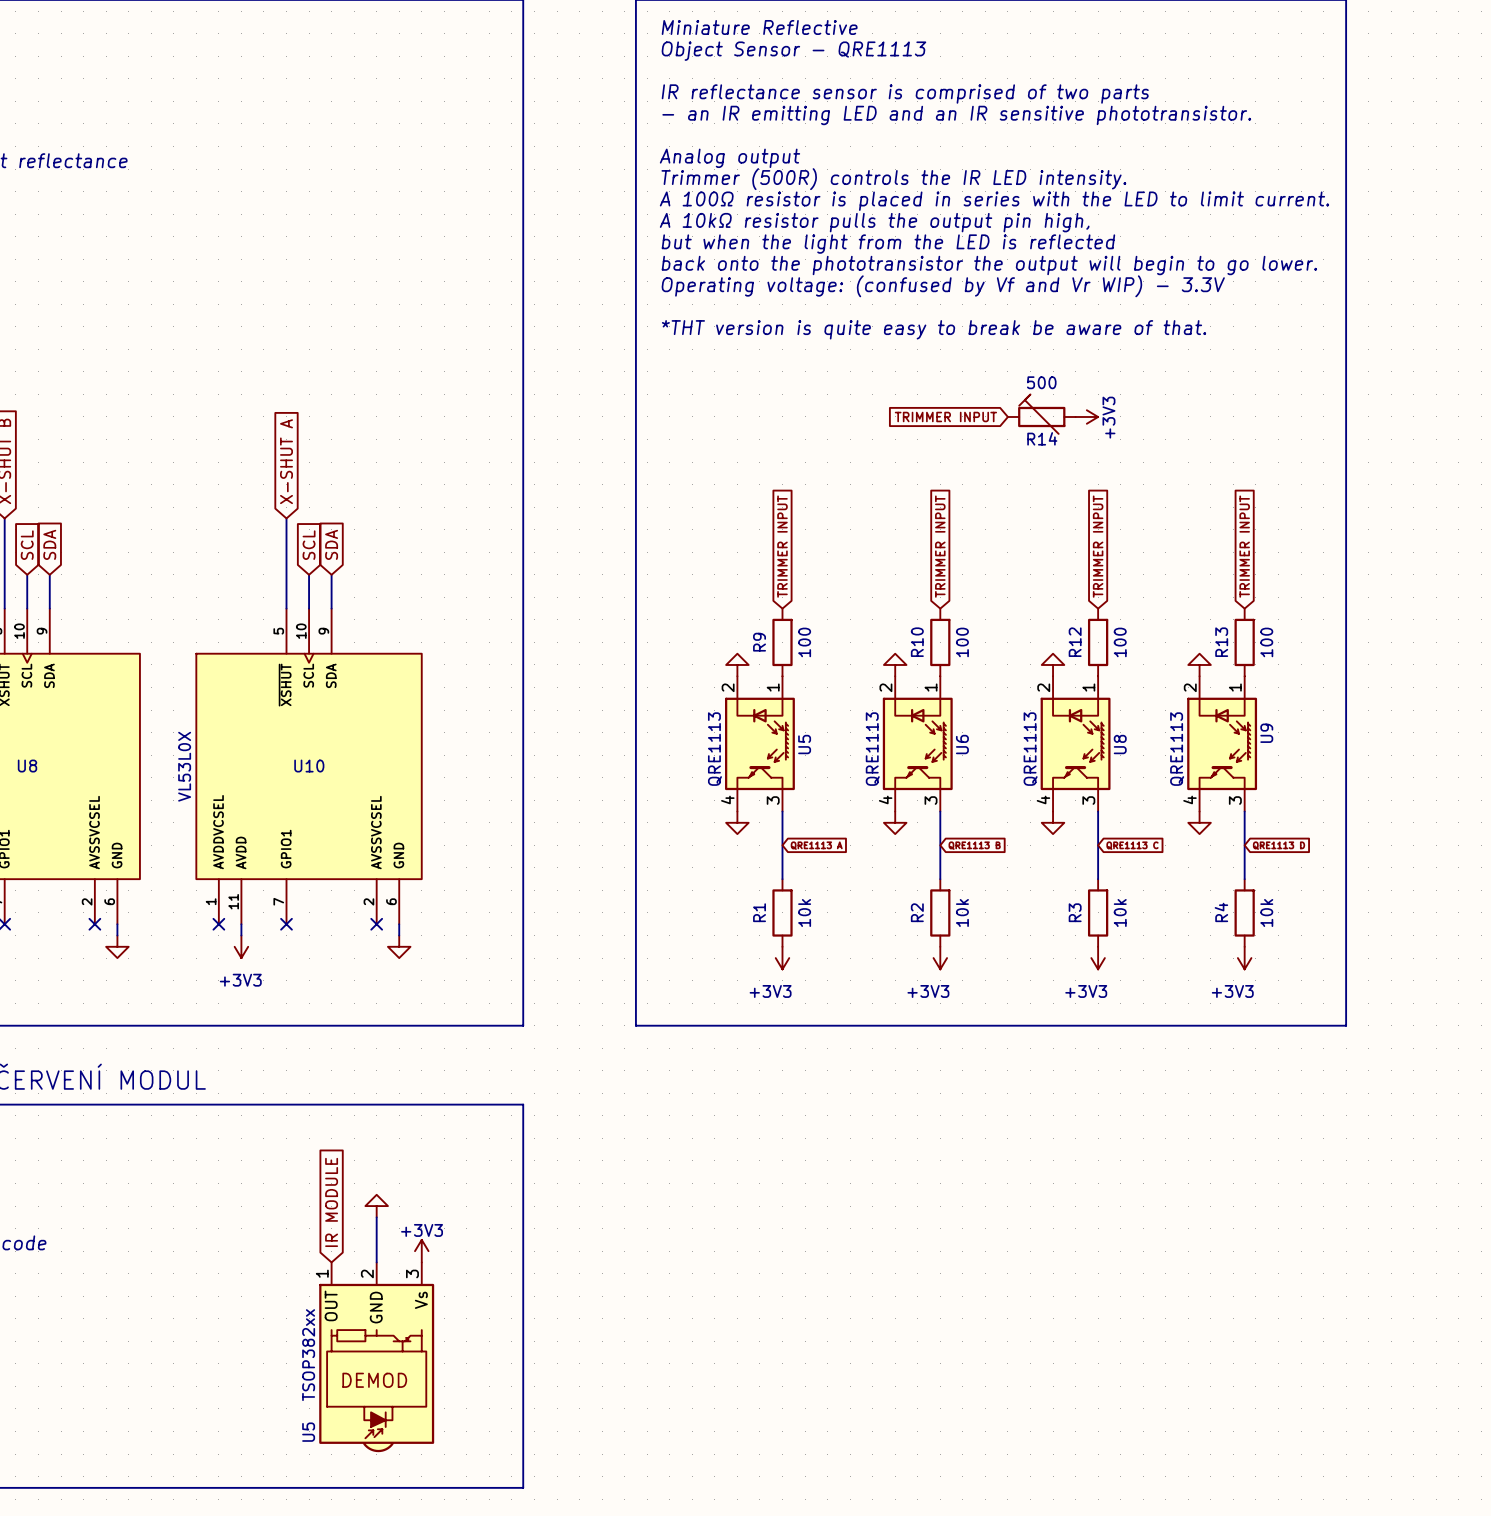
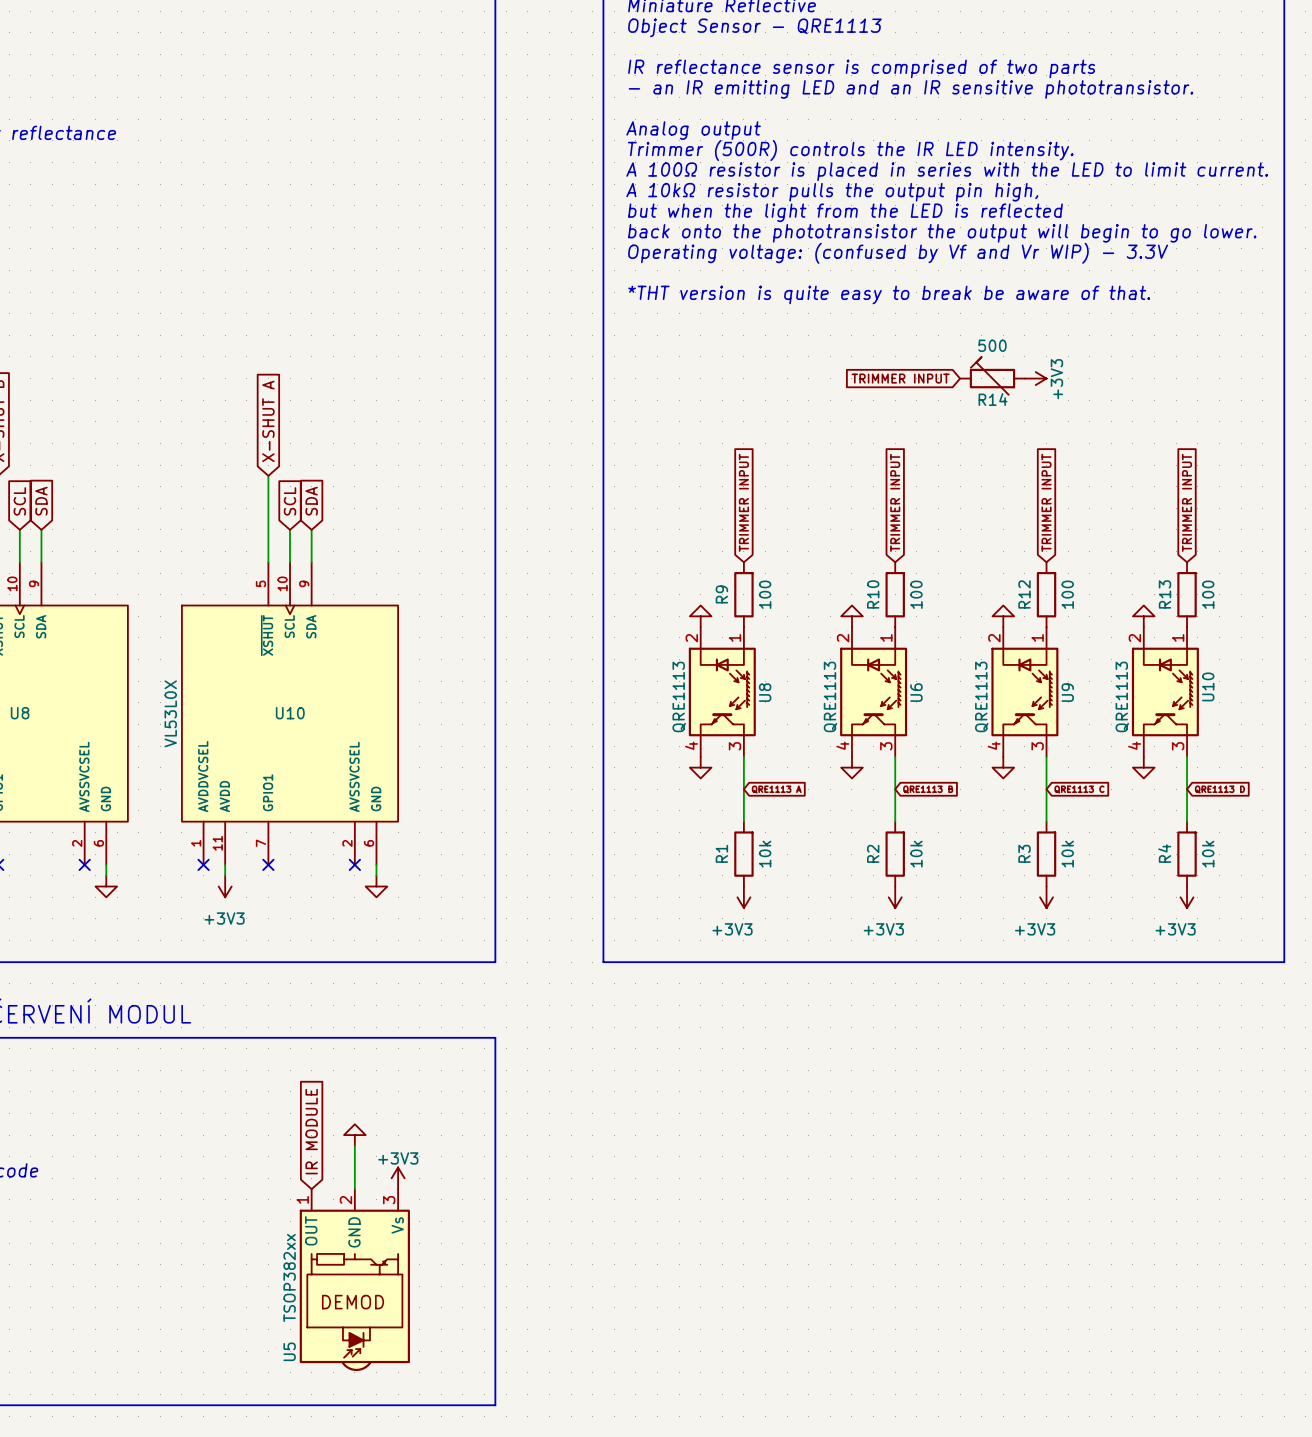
U9 name: U9 (1266, 733) -> U10 (1208, 686)
U5 name: U5 (804, 744) -> U8 (765, 692)
U8 name: U8 (1120, 744) -> U9 (1067, 692)

